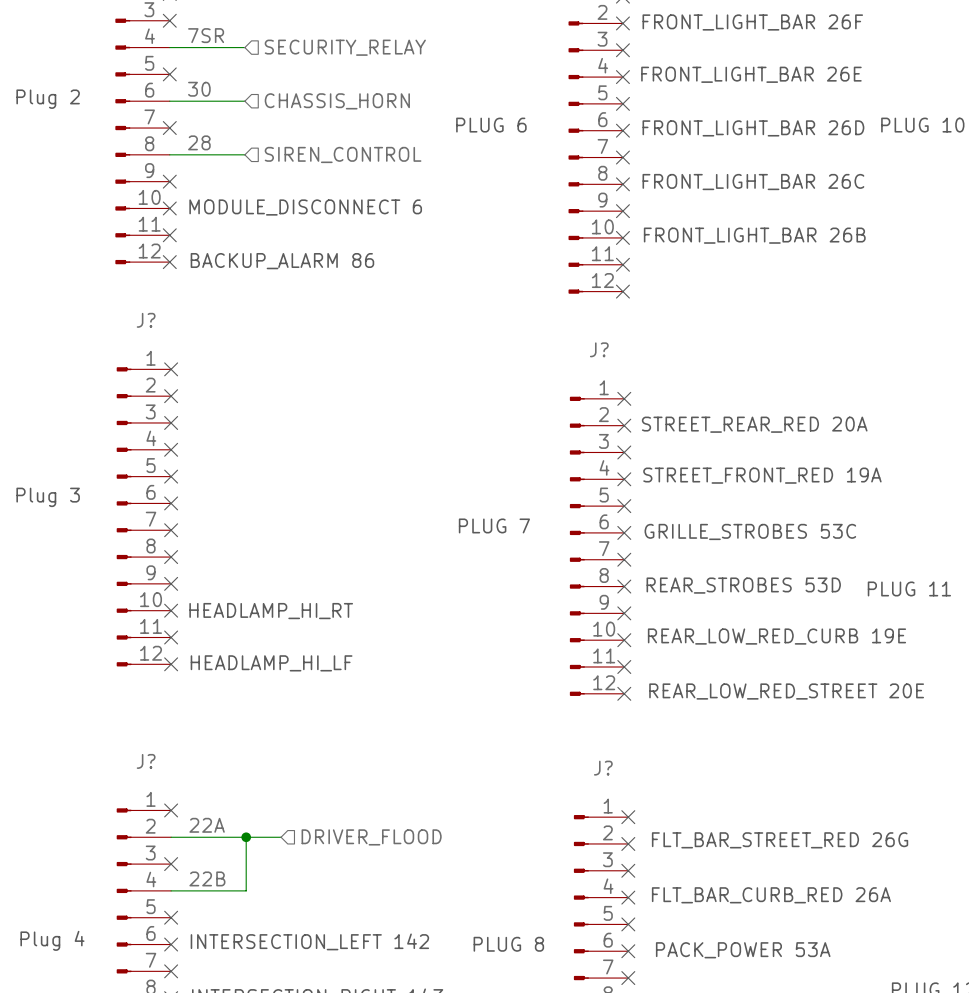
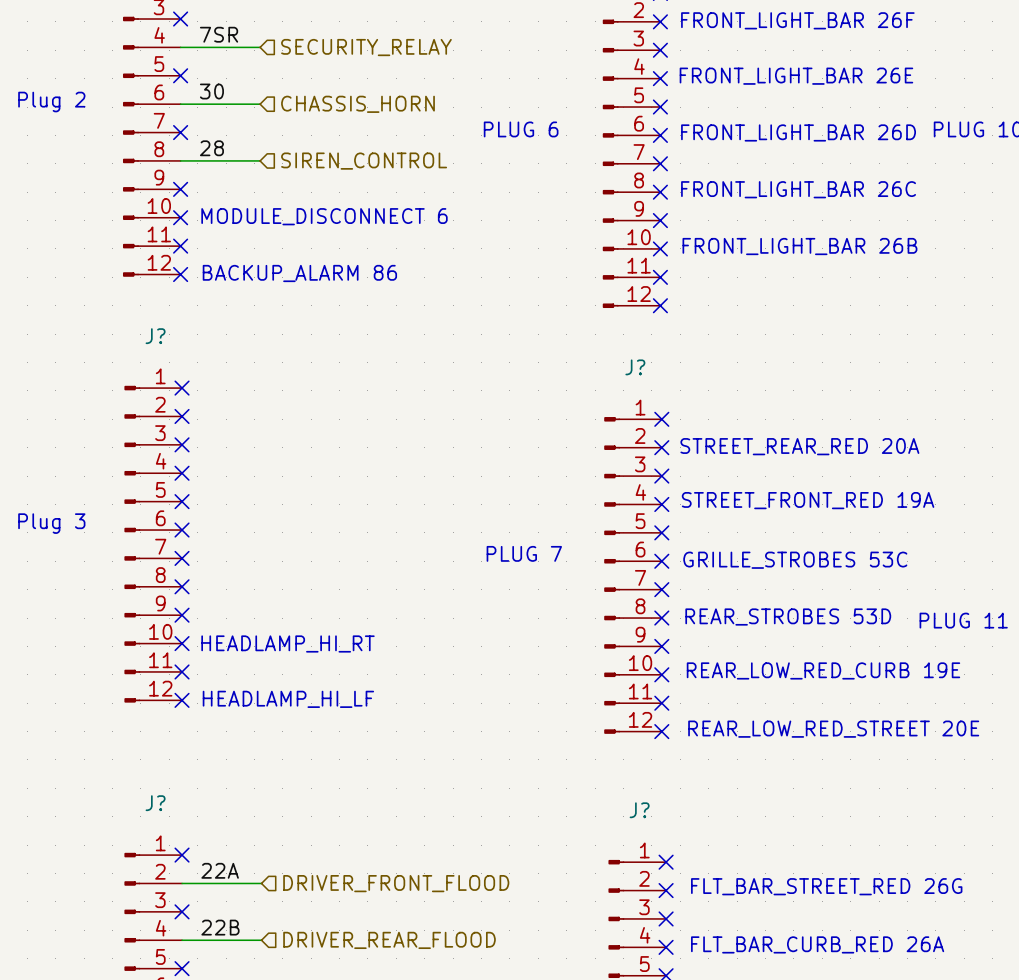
junction: (246, 837) -> none
wire: (281, 837) (246, 837) (246, 890) -> none
hierarchical label: DRIVER_FLOOD (371, 837) -> DRIVER_FRONT_FLOOD (396, 883)
hierarchical label: none -> DRIVER_REAR_FLOOD (389, 940)

